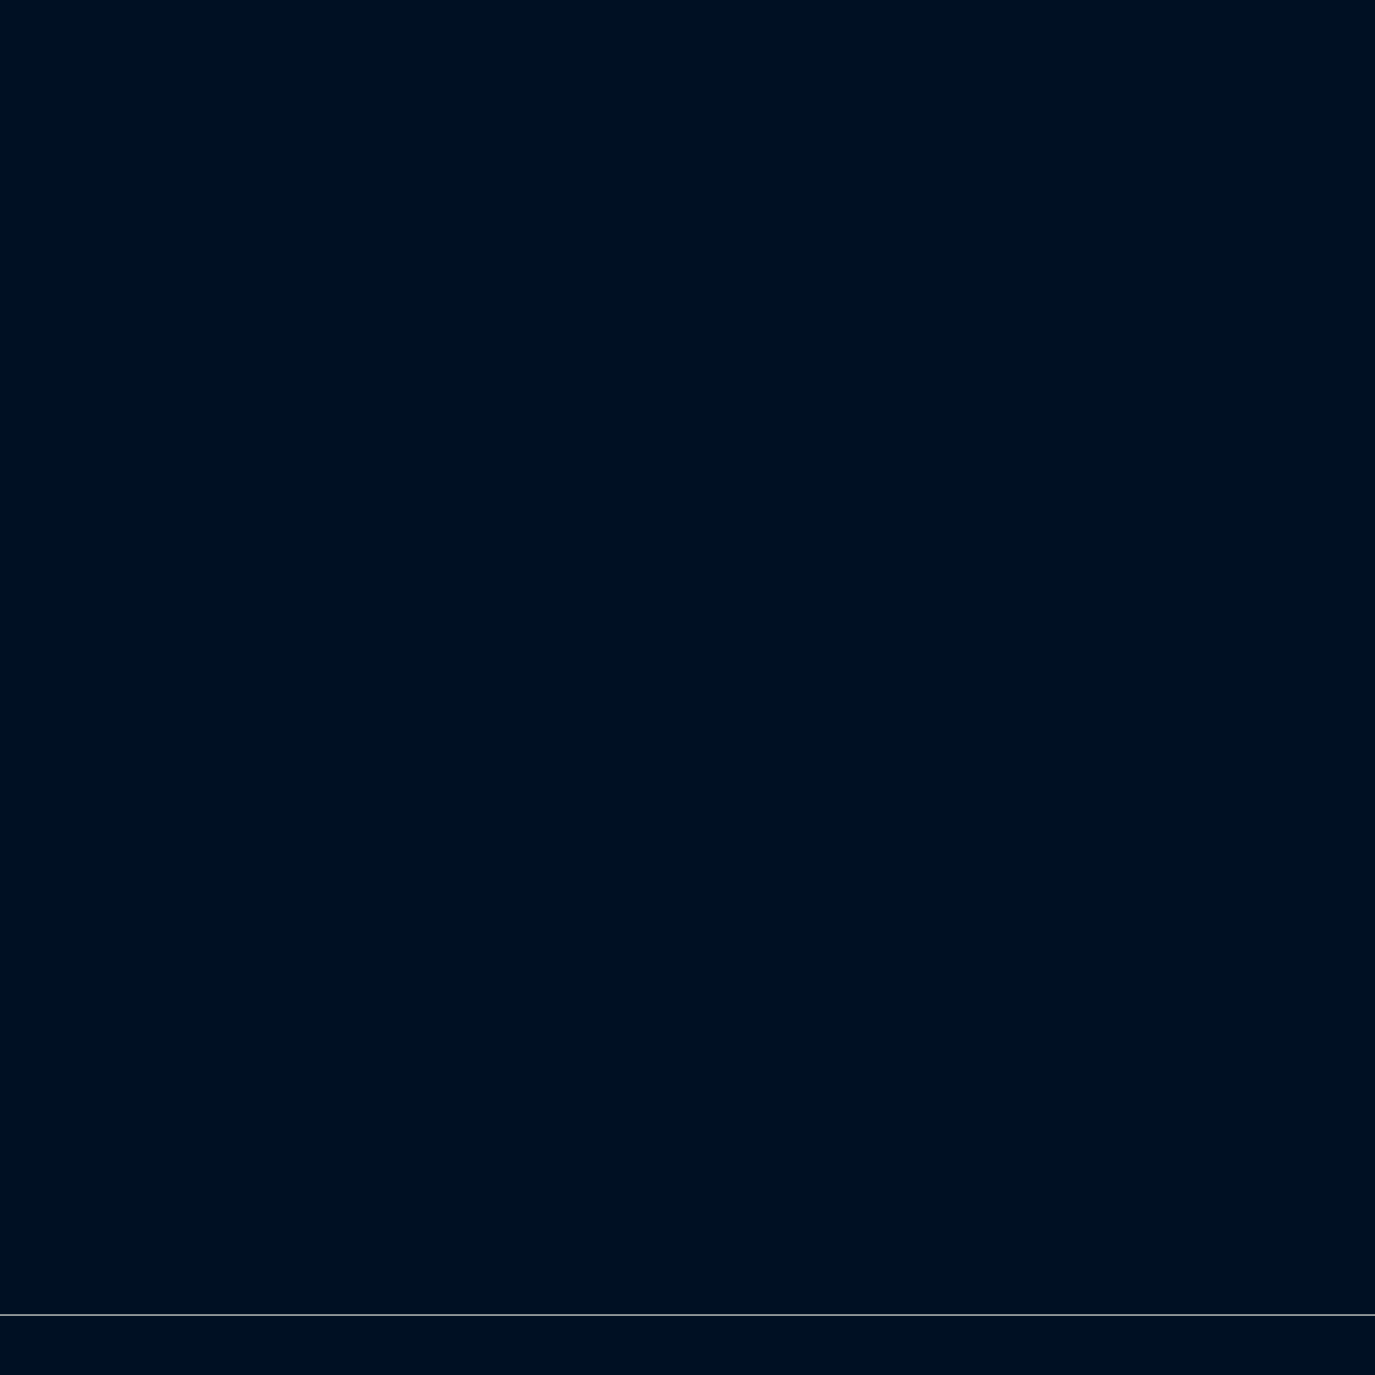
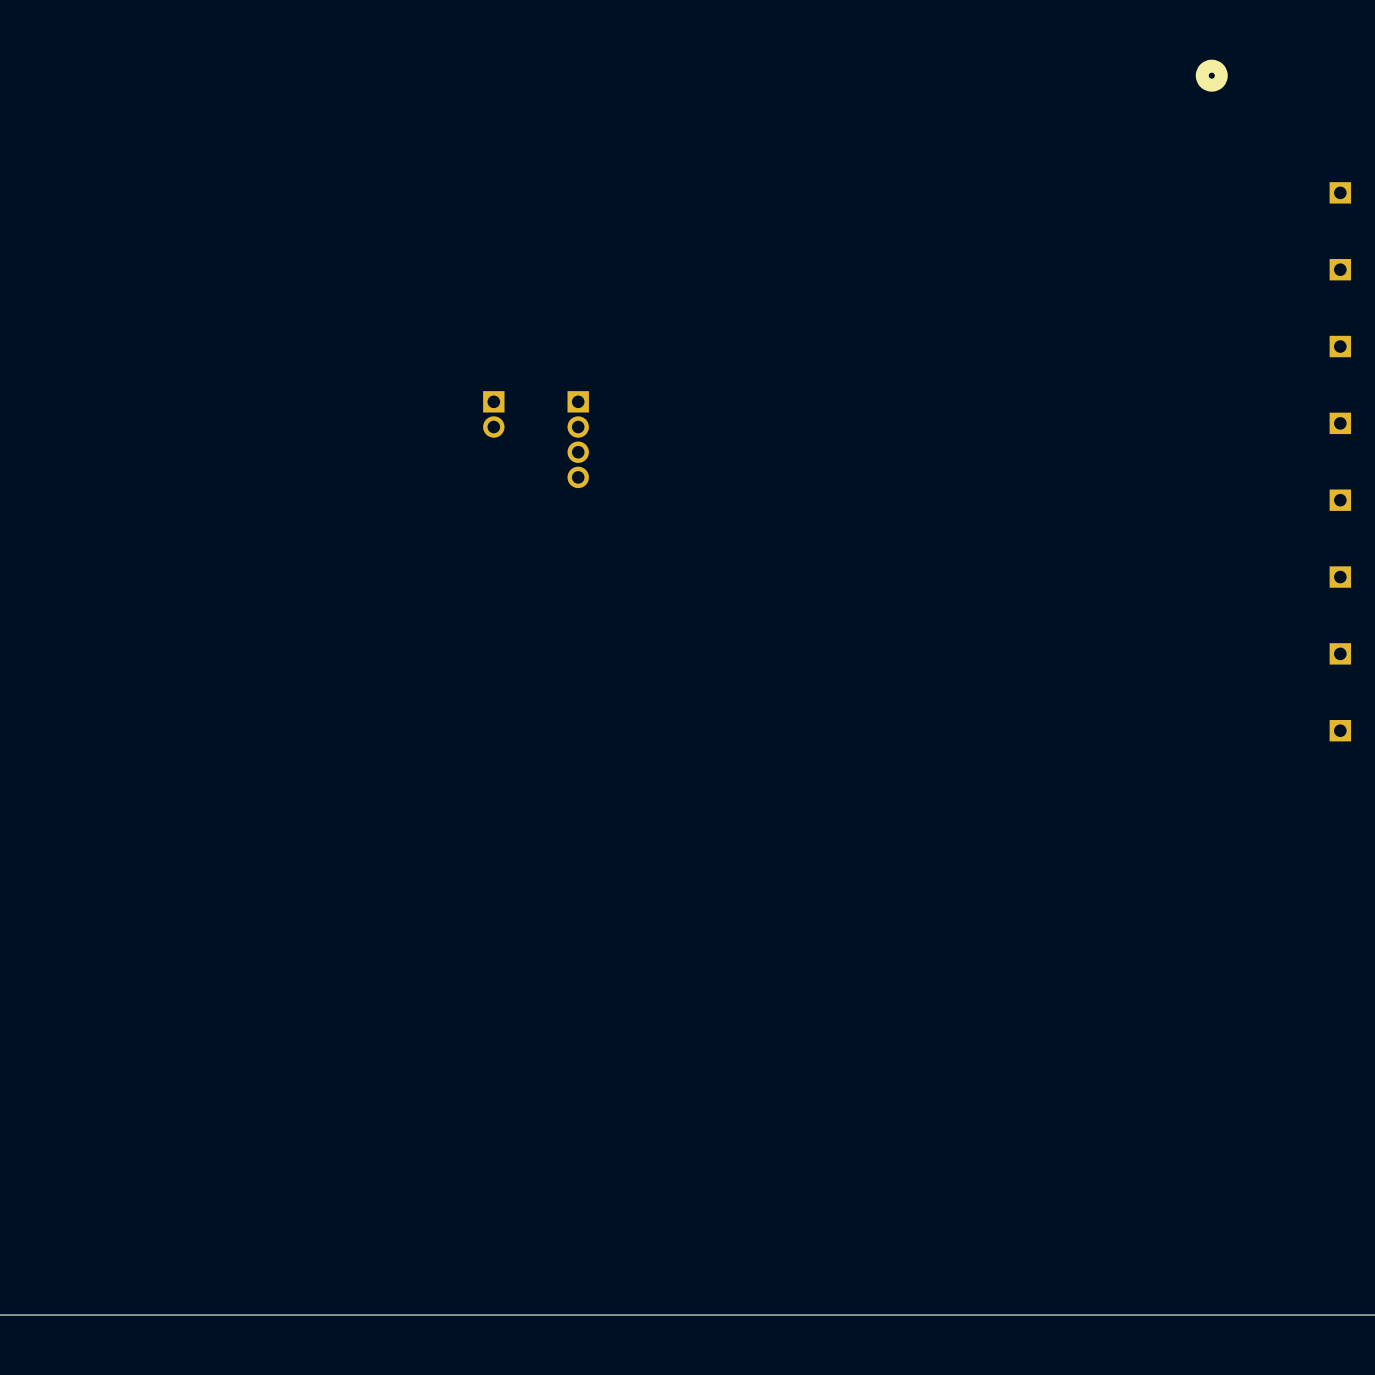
part: none -> (1211, 75)
part: none -> (1340, 192)
part: none -> (1340, 269)
part: none -> (1340, 346)
part: none -> (493, 414)
part: none -> (1340, 423)
part: none -> (578, 439)
part: none -> (1340, 500)
part: none -> (1340, 577)
part: none -> (1340, 653)
part: none -> (1340, 730)

